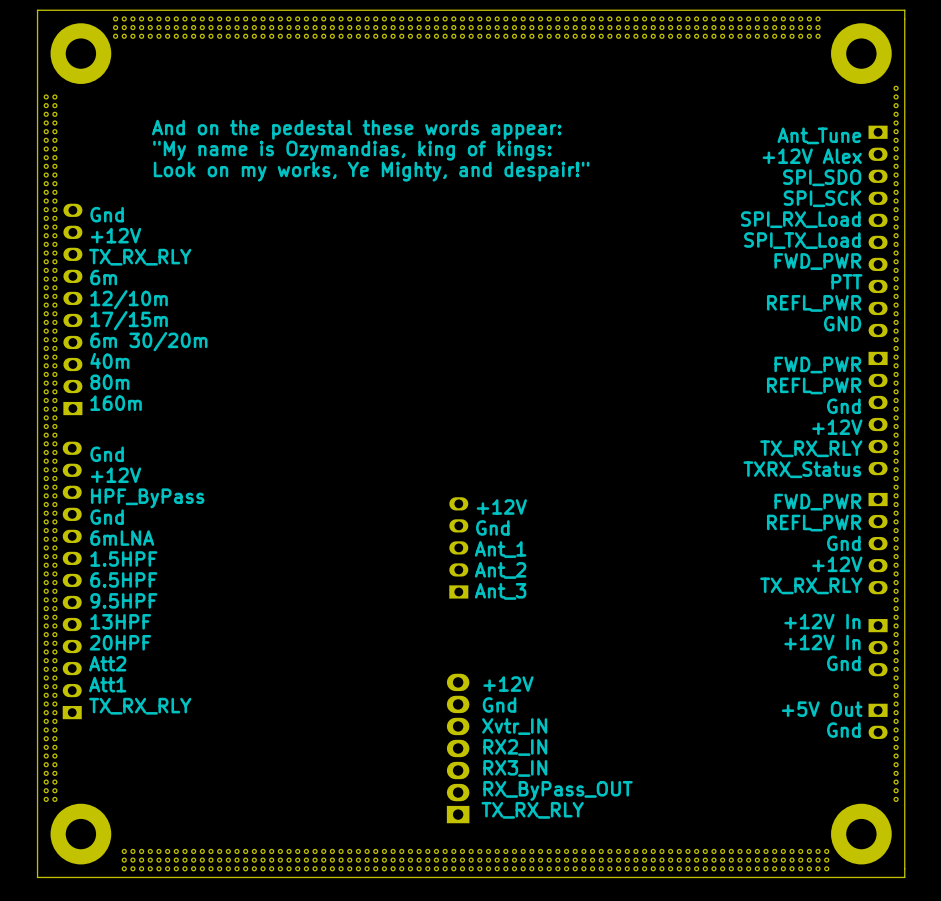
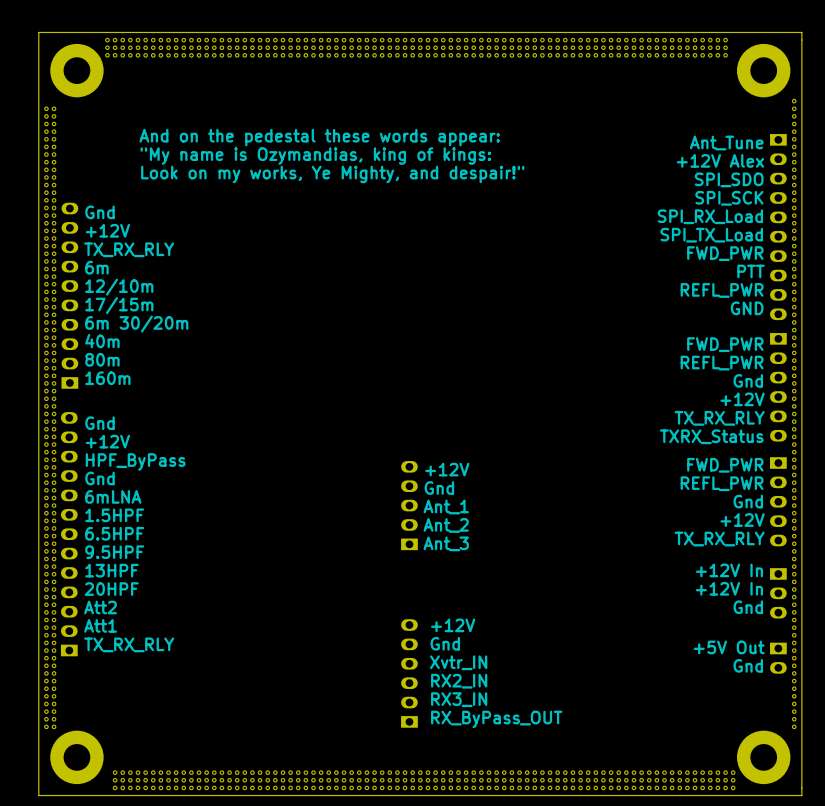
part: none -> (409, 673)
part: (458, 748) -> none
text: TX_RX_RLY (532, 810) -> none

